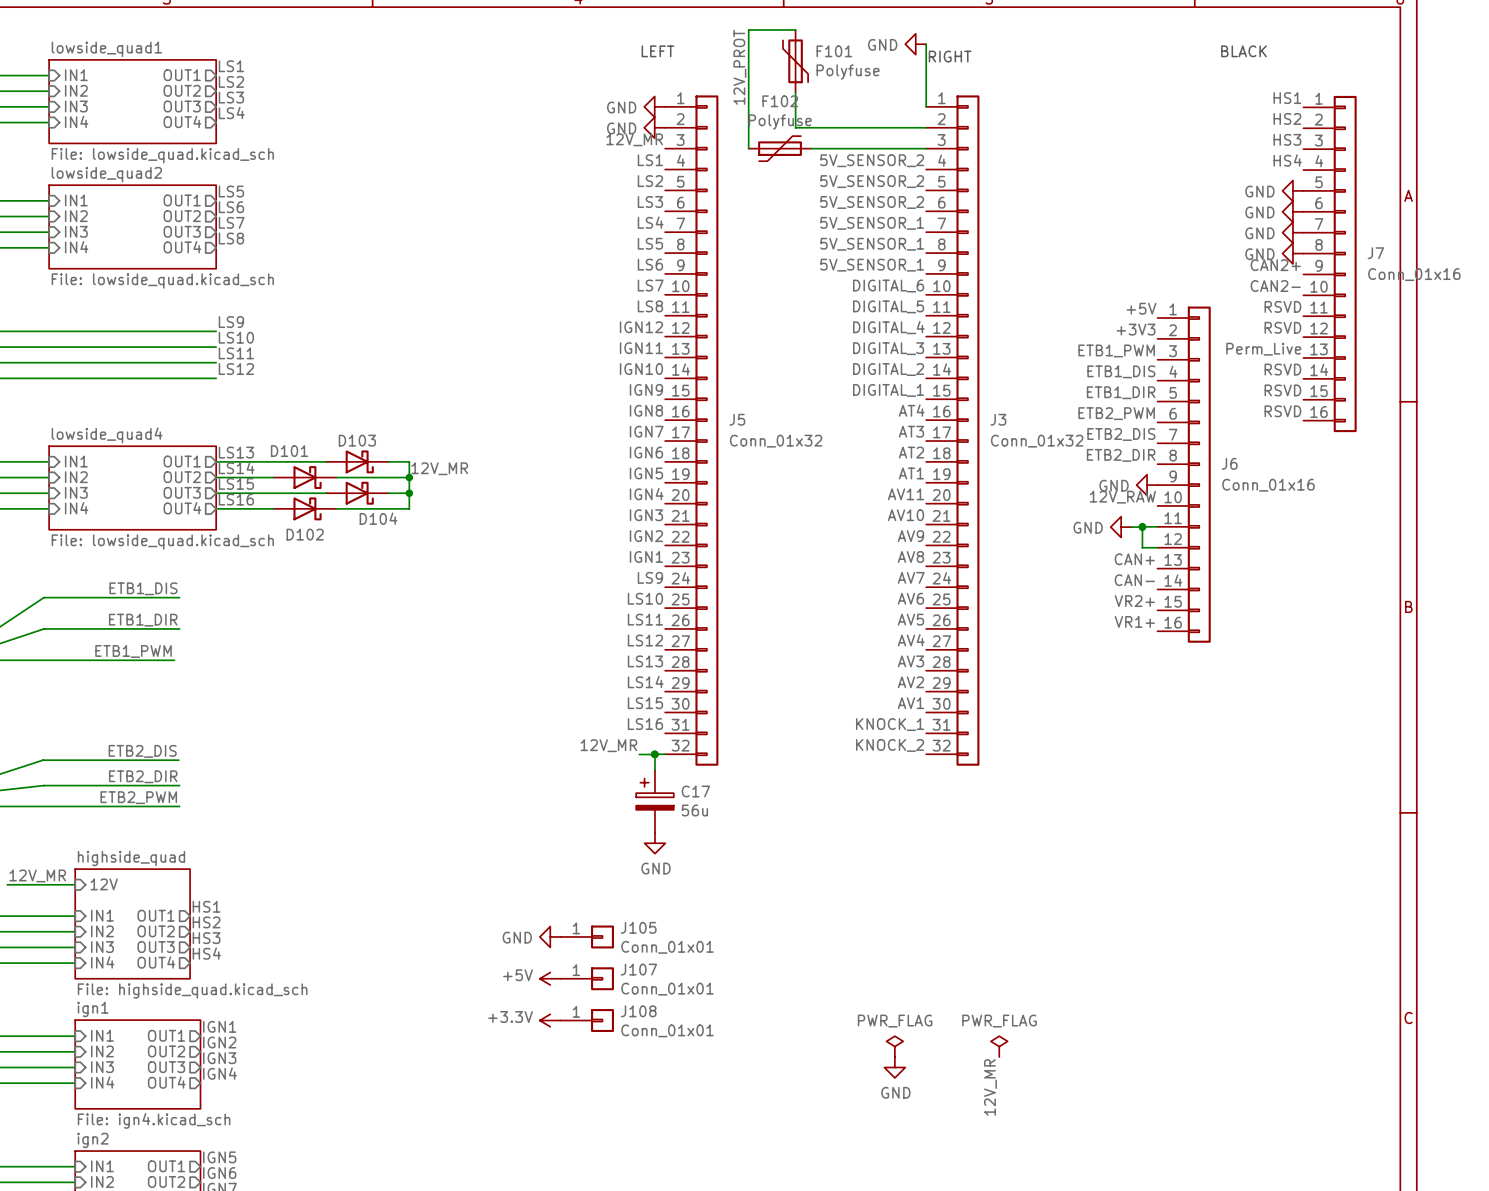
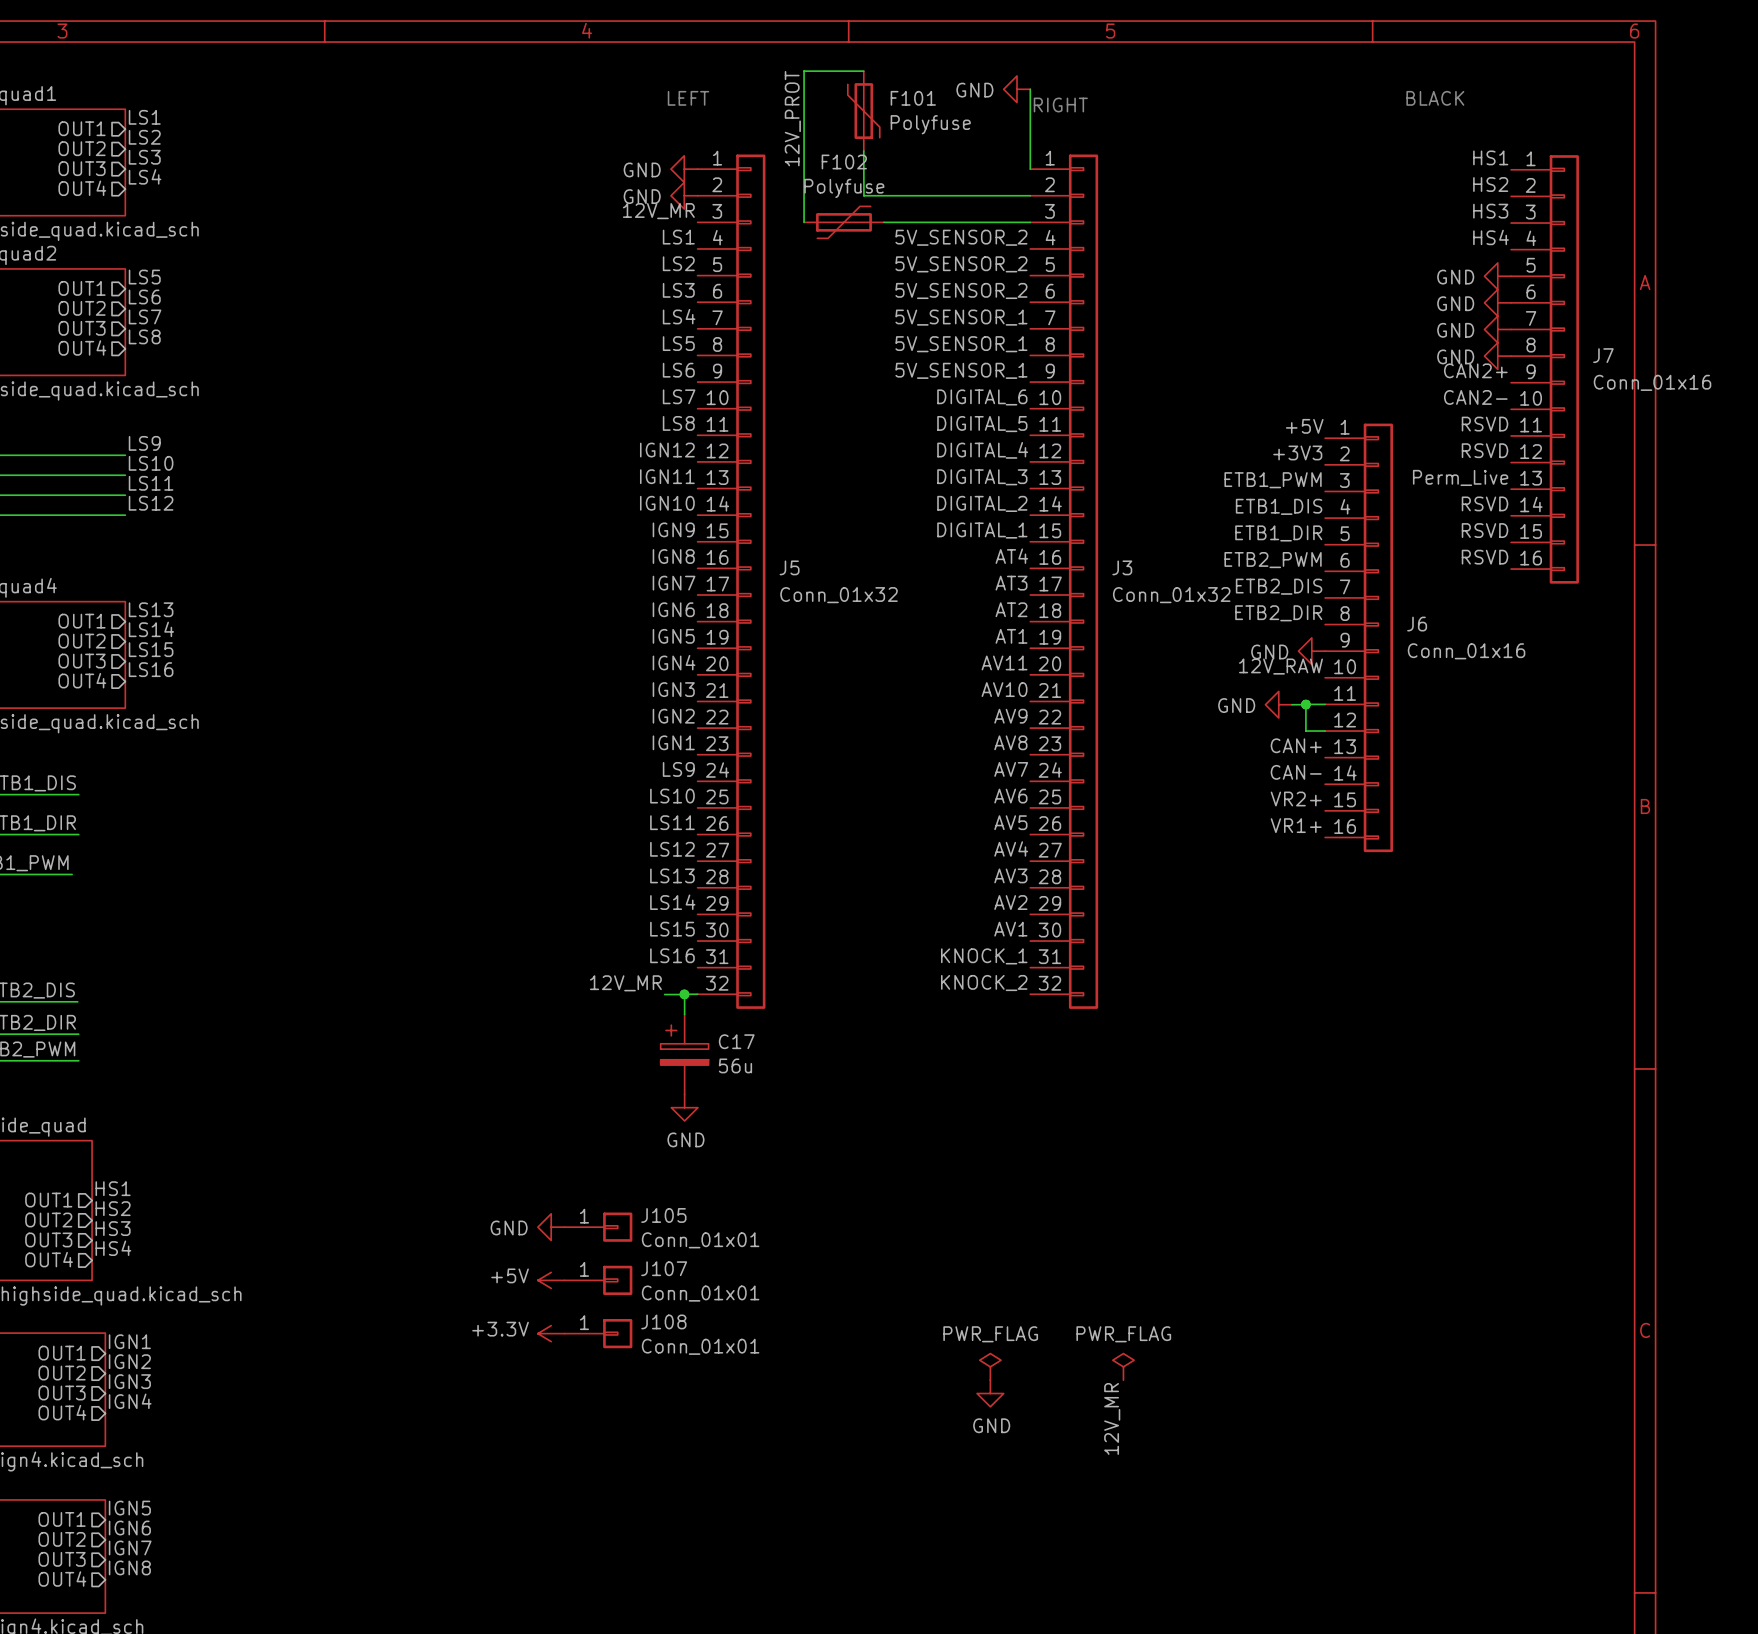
wire: (216, 461) (325, 461) -> none
D103: (357, 461) -> none
wire: (388, 461) (409, 461) (409, 508) (336, 508) -> none
label: 12V_MR (439, 468) -> none
wire: (216, 477) (273, 477) -> none
D101: (304, 477) -> none
wire: (336, 477) (409, 477) -> none
junction: (409, 477) -> none
wire: (216, 493) (325, 493) -> none
D104: (357, 493) -> none
wire: (388, 493) (409, 493) -> none
junction: (409, 493) -> none
wire: (216, 508) (273, 508) -> none
D102: (304, 508) -> none

